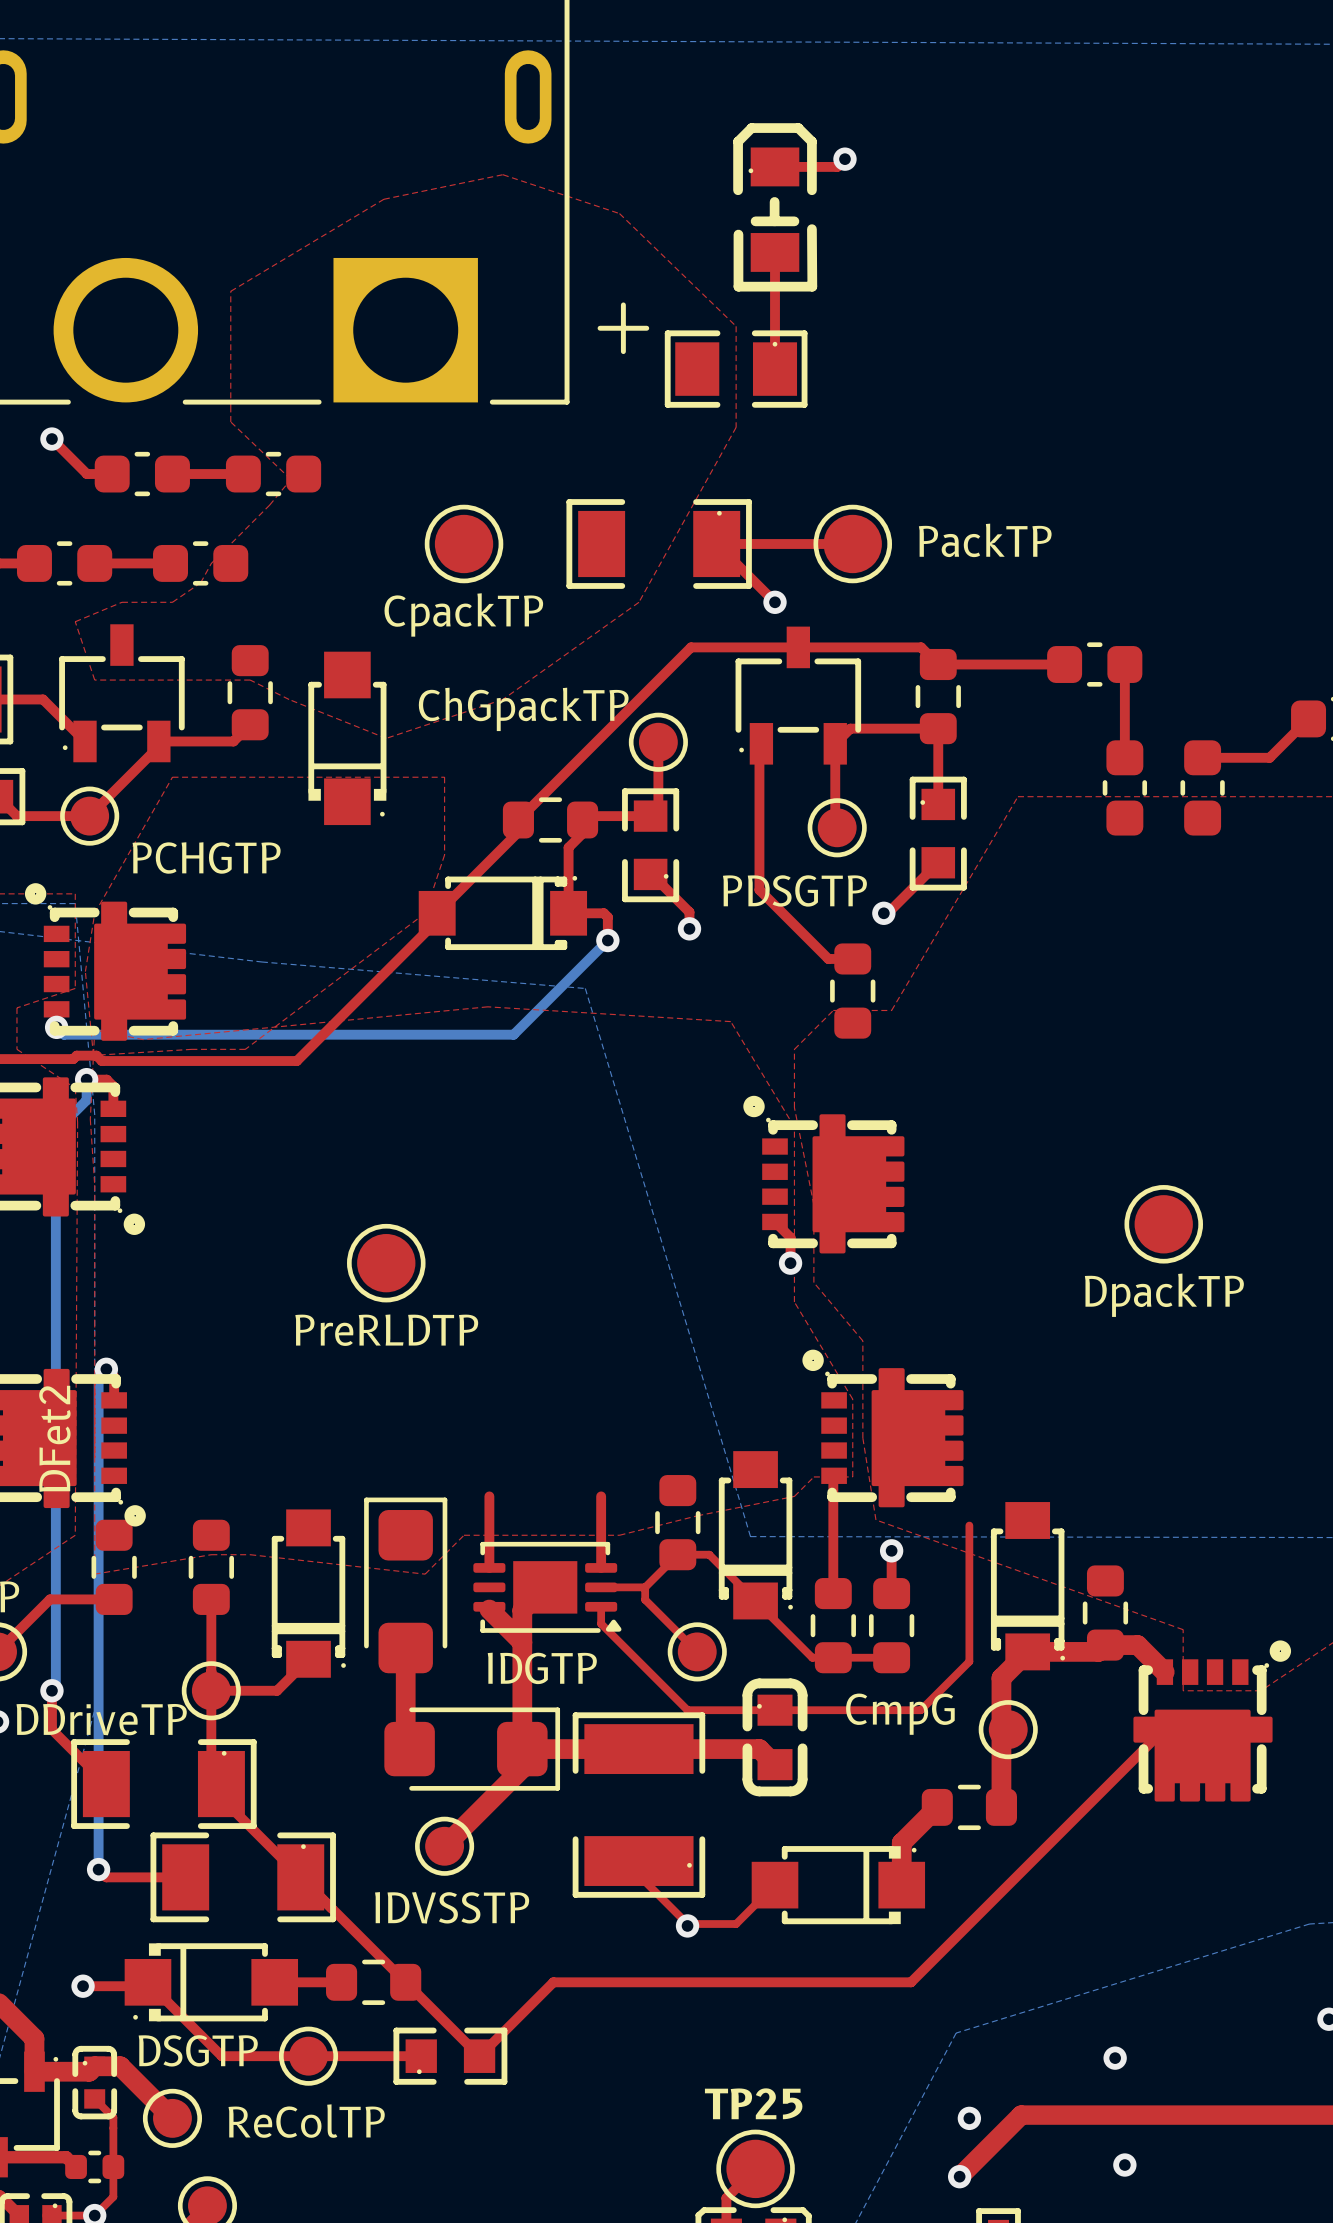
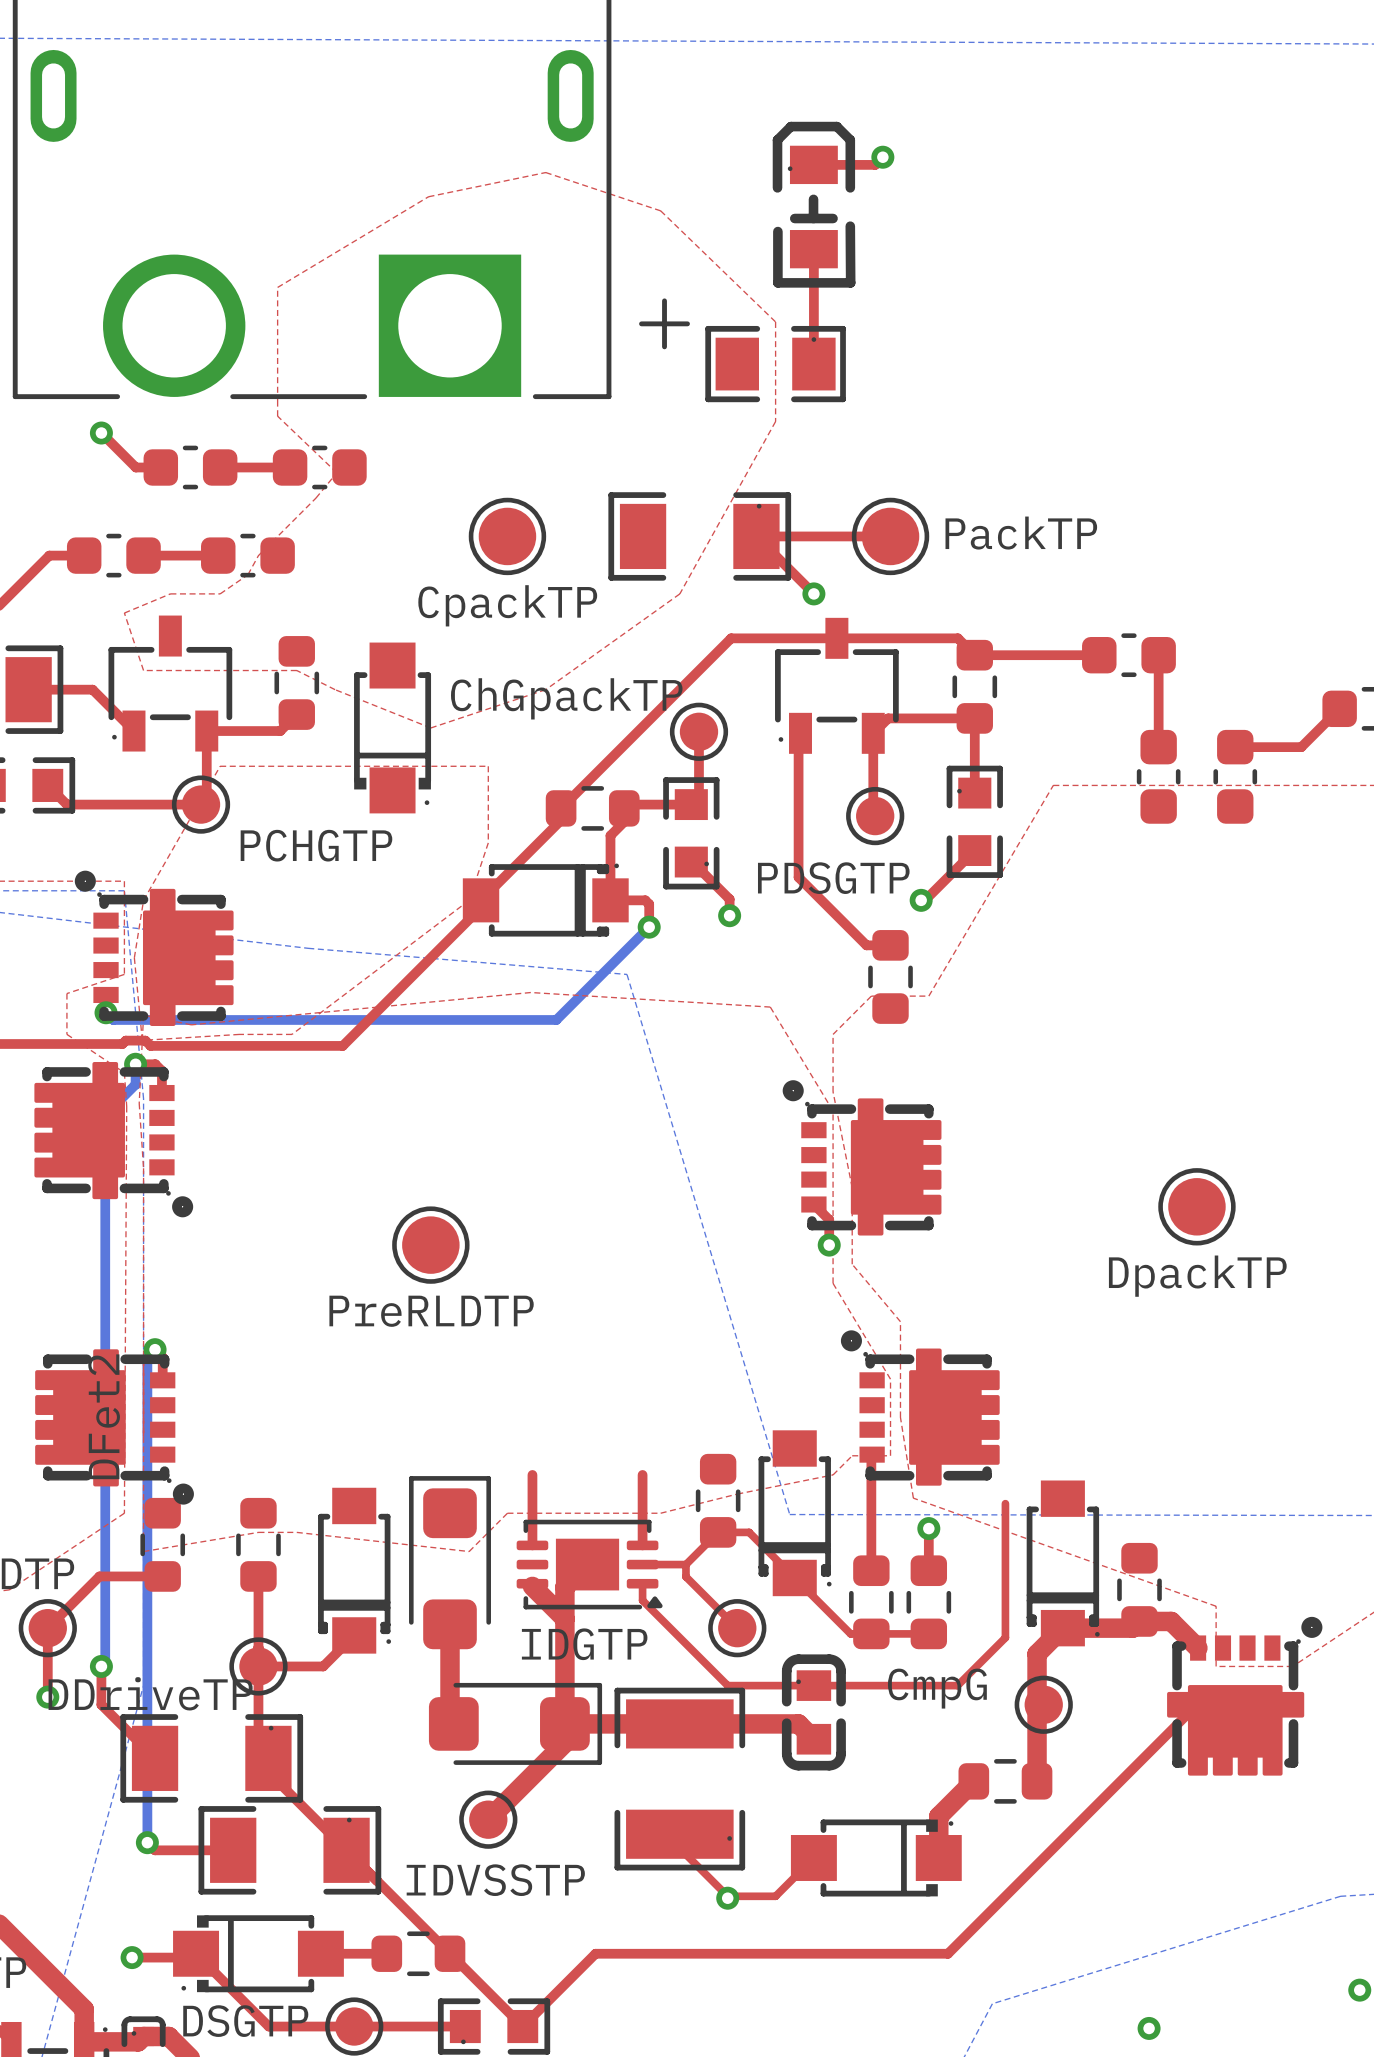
top track: (158, 746) (89, 816) -> (206, 736) (206, 798) (201, 804) (138, 804)
part position: (89, 816) -> (201, 804)

